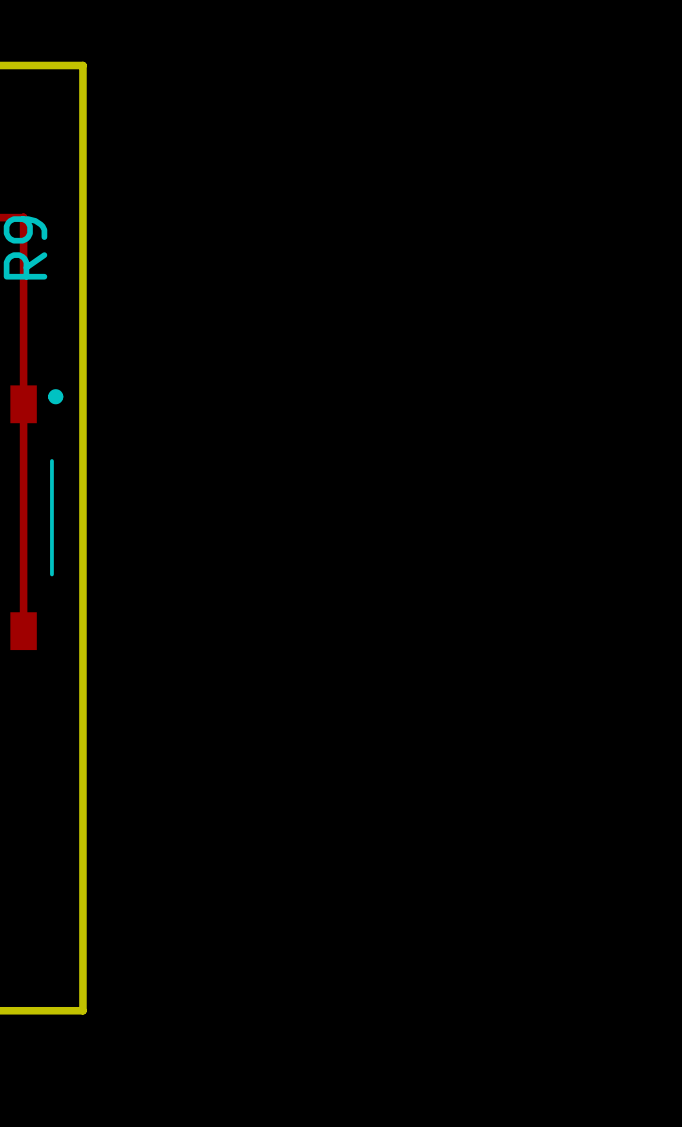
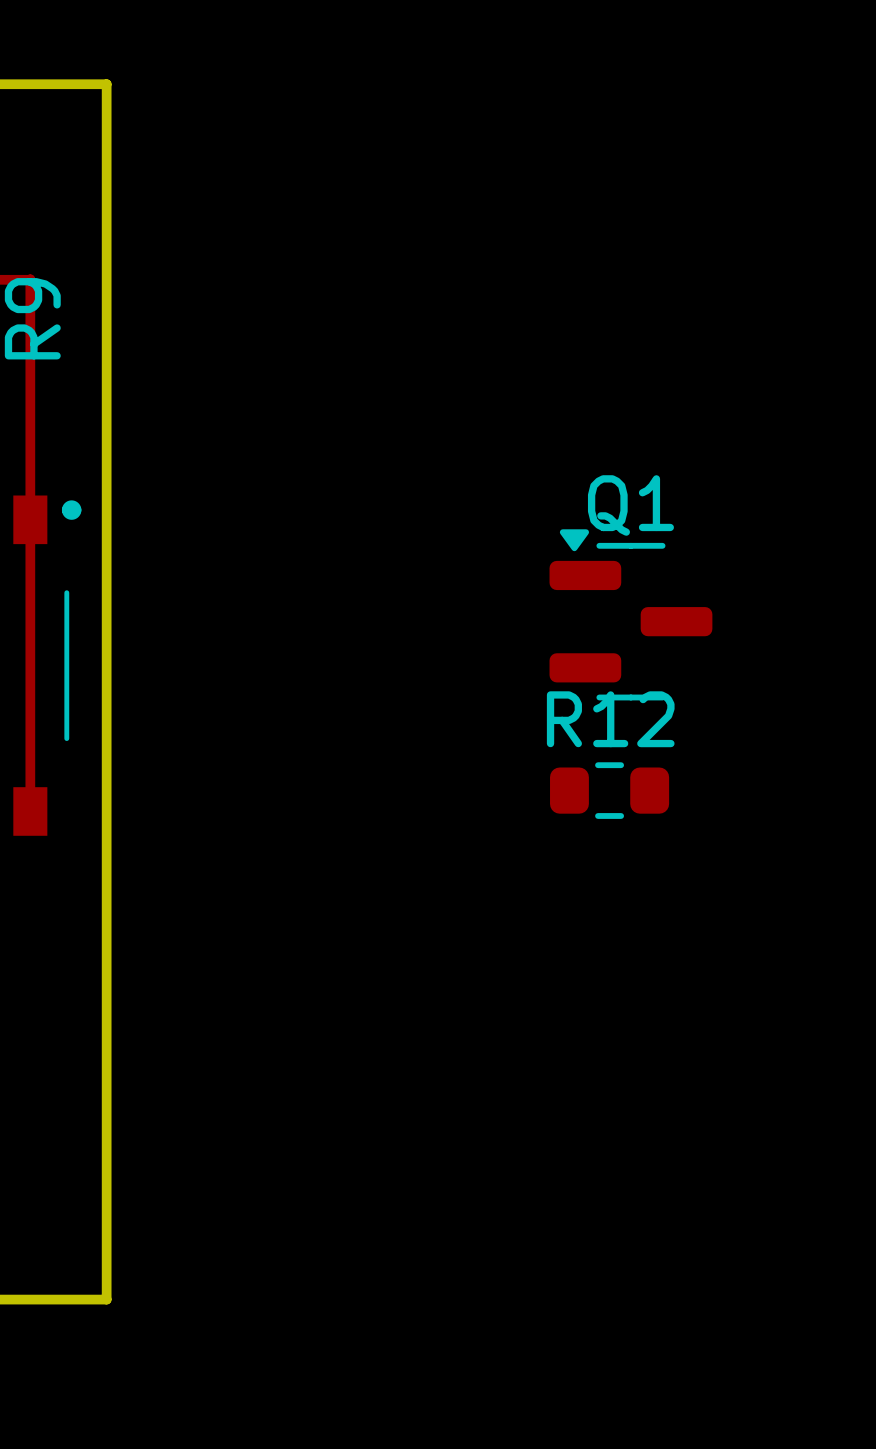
Q1: none -> (630, 614)
R12: none -> (609, 790)

